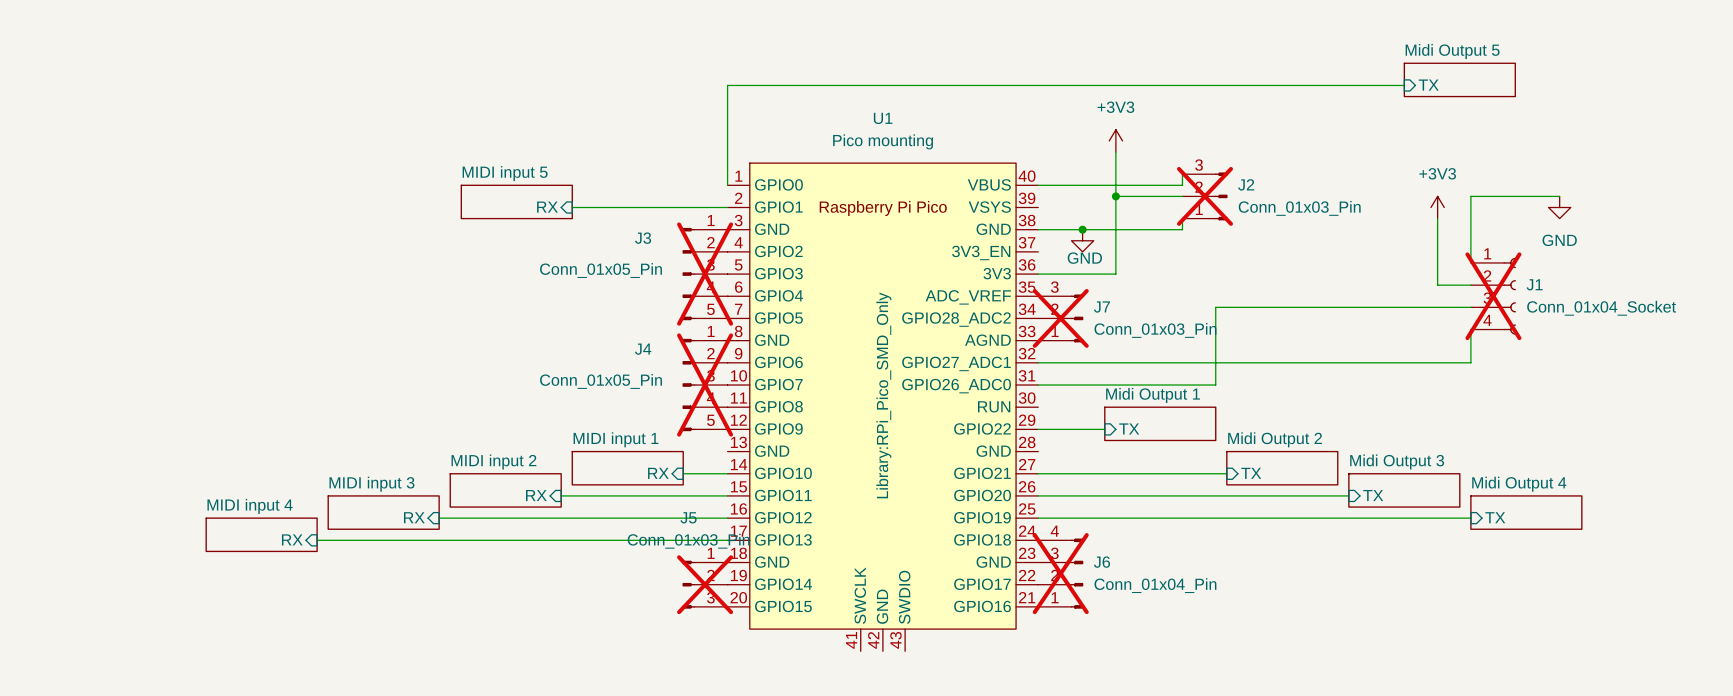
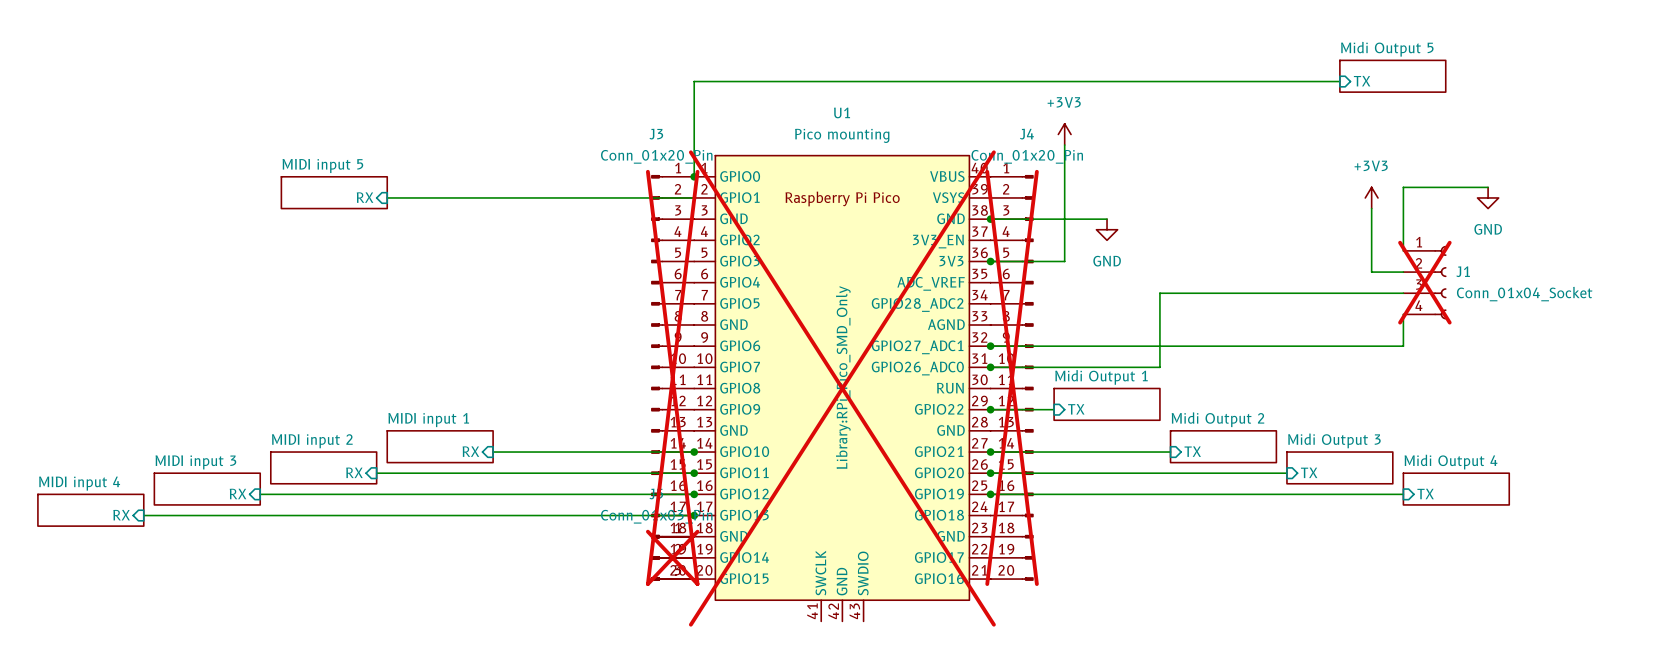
wire: (1182, 174) (1182, 185) (1038, 185) -> none
junction: none -> (694, 176)
wire: (1115, 196) (1182, 196) -> none
junction: (1115, 196) -> none
J2: Conn_01x03_Pin (1204, 196) -> none
sheet MIDI input 5 position: (516, 201) -> (334, 192)
sheet pin: none -> RX (365, 197)
wire: none -> (387, 197) (546, 197)
sheet pin: RX (547, 207) -> none
wire: (1182, 218) (1182, 229) (1160, 229) -> none
J3 symbol: [682, 227, 728, 321] -> [651, 175, 695, 581]
junction: none -> (990, 219)
junction: (1082, 229) -> none
J3 name position: J3 (643, 238) -> J3 (656, 134)
power symbol position: GND (1082, 240) -> GND (1107, 229)
power symbol text position: GND (1084, 258) -> GND (1107, 261)
J3 value: Conn_01x05_Pin (601, 270) -> Conn_01x20_Pin (656, 156)
junction: none -> (990, 261)
J7: Conn_01x03_Pin (1060, 318) -> none
J4 symbol: [682, 338, 728, 432] -> [990, 175, 1034, 581]
J4 name position: J4 (643, 349) -> J4 (1026, 134)
junction: none -> (990, 346)
J4 value: Conn_01x05_Pin (601, 381) -> Conn_01x20_Pin (1027, 156)
junction: none -> (990, 367)
U1 do-not-place cross: none -> (842, 388)
junction: none -> (990, 409)
sheet MIDI input 1 position: (627, 468) -> (440, 446)
sheet pin: none -> RX (470, 451)
wire: none -> (493, 452) (651, 452)
sheet pin: RX (658, 473) -> none
junction: none -> (694, 452)
junction: none -> (990, 452)
sheet MIDI input 2 position: (505, 490) -> (323, 467)
sheet pin: none -> RX (354, 472)
wire: none -> (376, 473) (535, 473)
sheet pin: RX (536, 495) -> none
junction: none -> (694, 473)
junction: none -> (990, 473)
sheet MIDI input 3 position: (383, 512) -> (207, 489)
sheet pin: none -> RX (238, 493)
sheet pin: RX (414, 517) -> none
wire: none -> (260, 494) (418, 494)
junction: none -> (694, 494)
junction: none -> (990, 494)
sheet MIDI input 4 position: (261, 534) -> (90, 510)
sheet pin: none -> RX (121, 515)
sheet pin: RX (292, 539) -> none
wire: none -> (143, 515) (302, 515)
junction: none -> (694, 515)
J6: Conn_01x04_Pin (1060, 573) -> none

